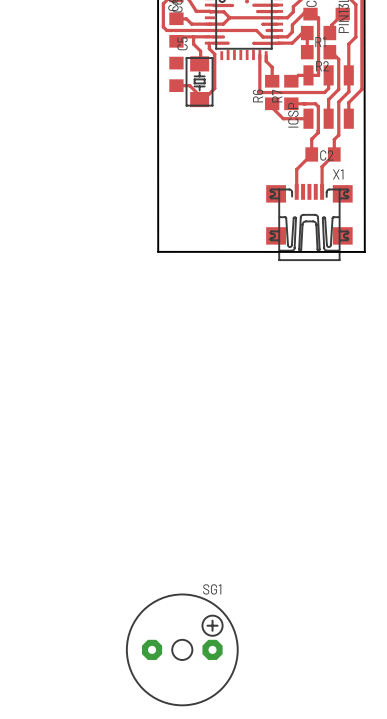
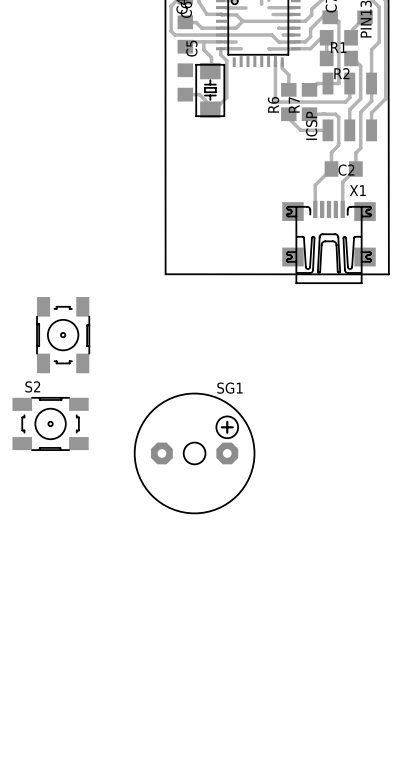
part: none -> (63, 335)
S2: none -> (50, 423)
SG1 position: (182, 649) -> (194, 453)

